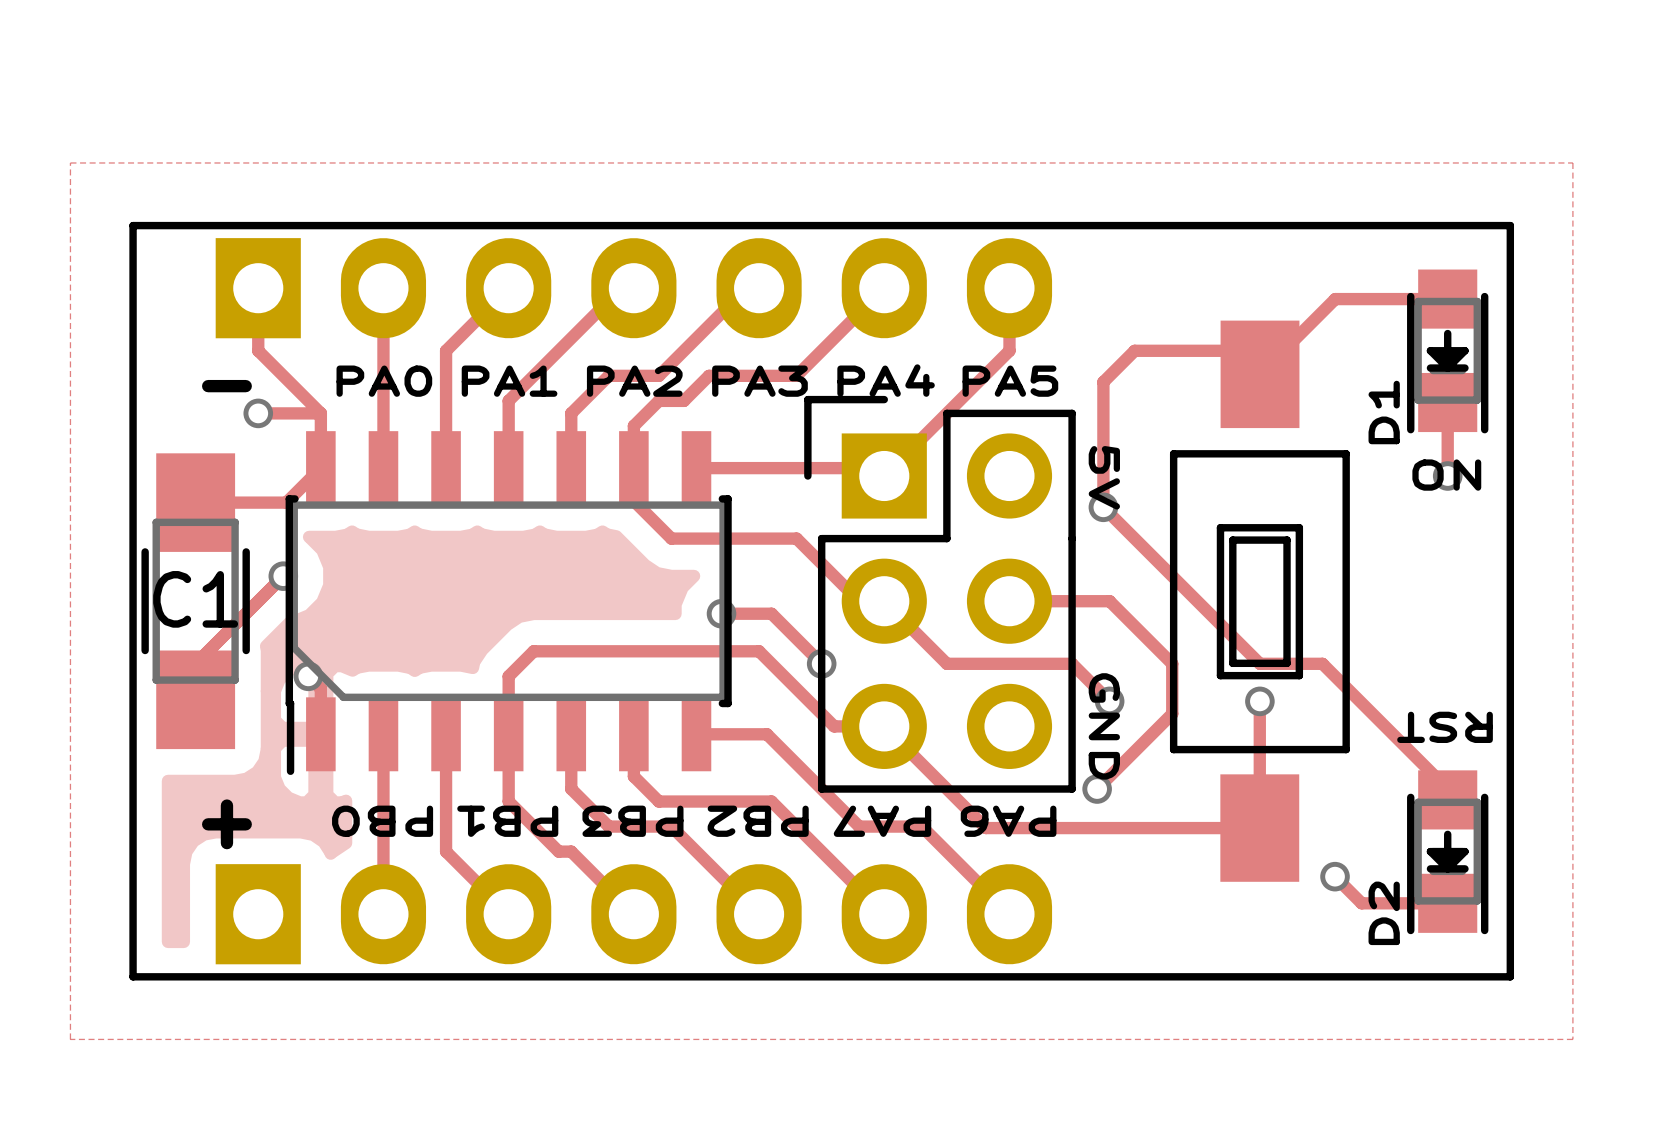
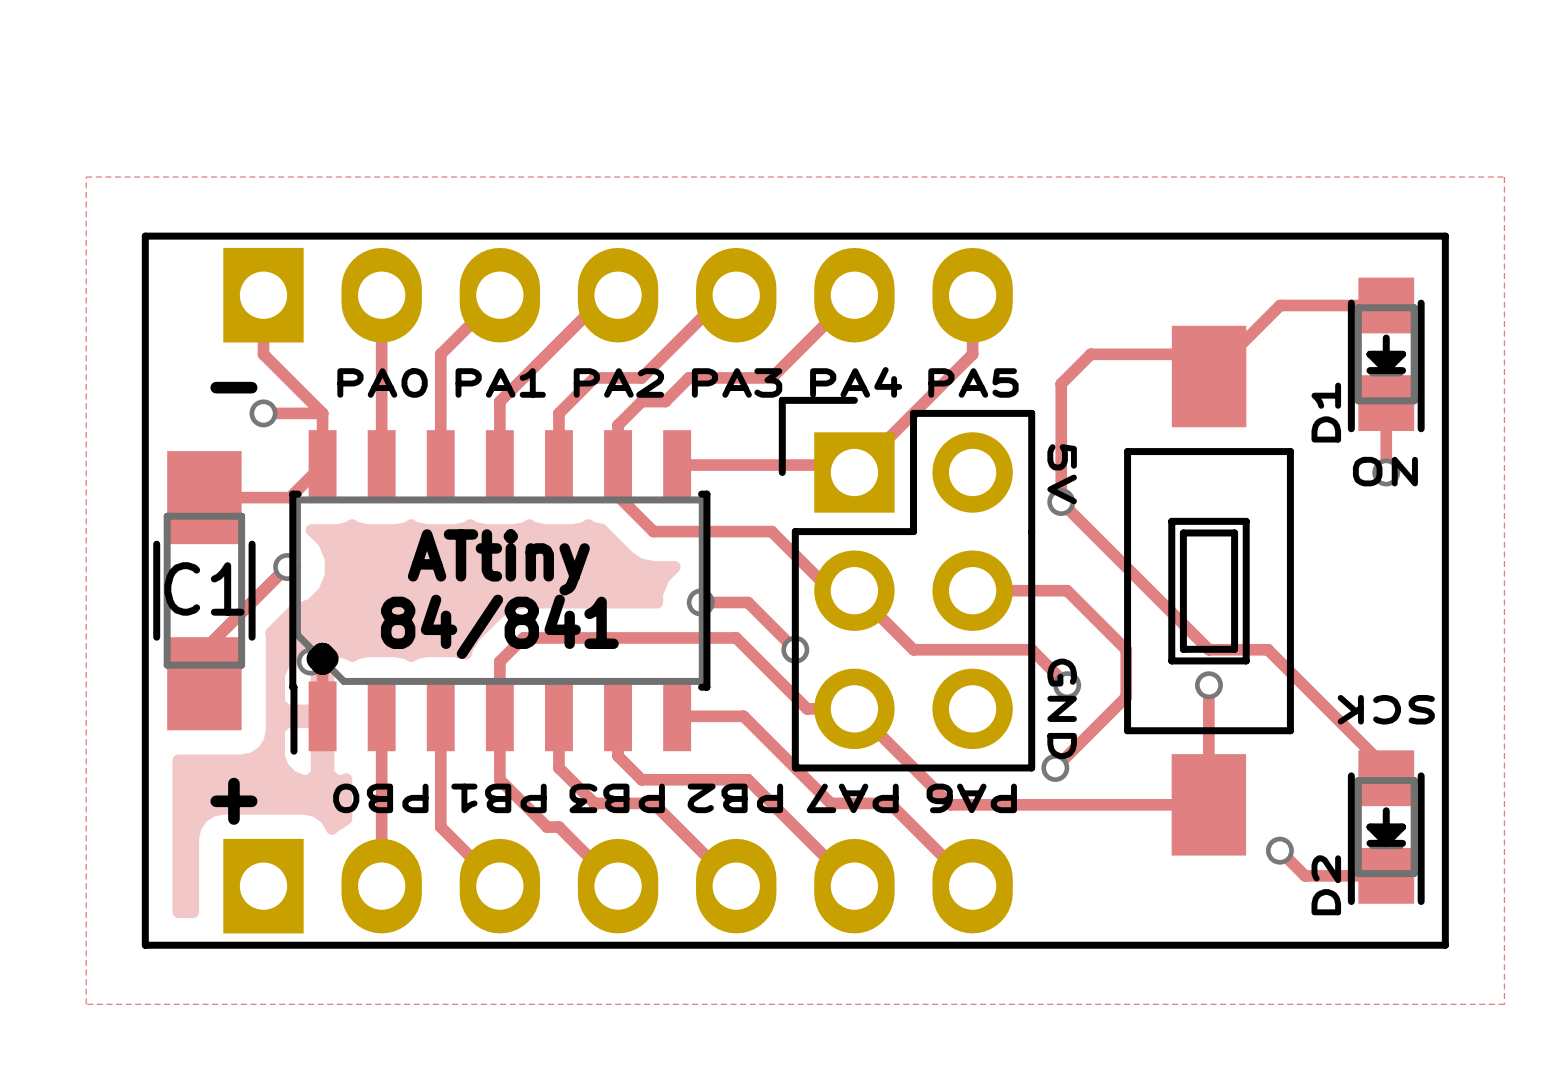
text: none -> ATtiny (498, 562)
text: none -> 84/841 (499, 626)
text: none -> . (322, 658)
text: RST (1445, 727) -> SCK (1386, 709)

